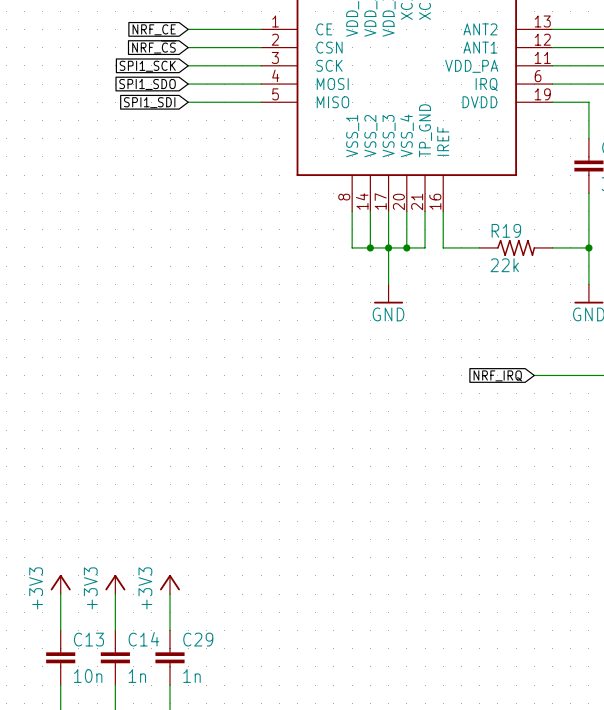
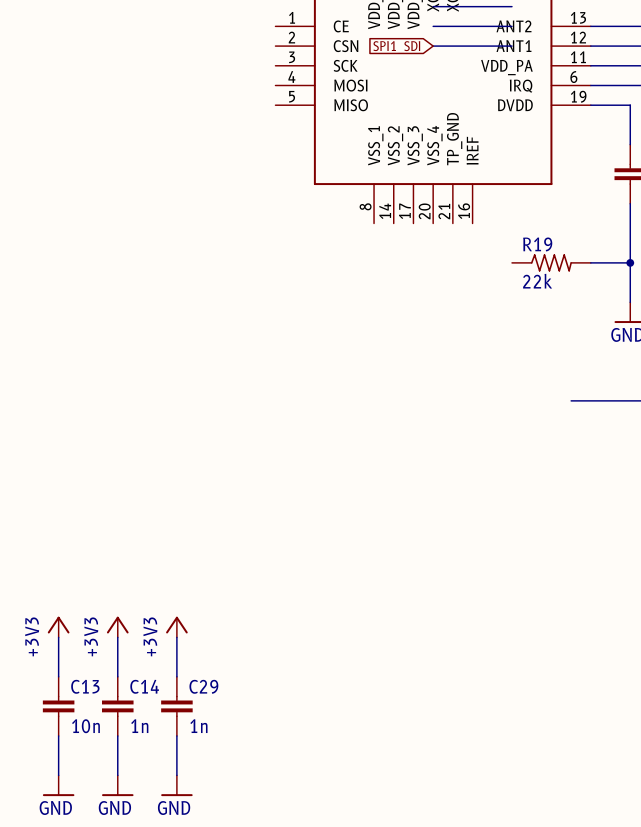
wire: none -> (433, 6) (512, 6)
global label: NRF_CE (154, 29) -> none
wire: (188, 29) (261, 29) -> none
wire: none -> (433, 26) (512, 26)
global label: NRF_~{CS} (154, 46) -> none
wire: (188, 47) (261, 47) -> none
wire: none -> (433, 46) (512, 46)
global label: none -> SPI1_SDI (396, 47)
wire: (188, 65) (261, 65) -> none
global label: SPI1_SCK (147, 66) -> none
global label: SPI1_SDO (147, 84) -> none
wire: (188, 84) (261, 84) -> none
global label: SPI1_SDI (149, 102) -> none
wire: (188, 102) (261, 102) -> none
wire: (352, 211) (352, 247) (425, 247) (425, 211) -> none
wire: (370, 211) (370, 247) -> none
wire: (388, 211) (388, 284) -> none
wire: (406, 211) (406, 247) -> none
wire: (443, 211) (443, 247) (479, 247) -> none
junction: (370, 247) -> none
junction: (388, 247) -> none
junction: (406, 247) -> none
power symbol: GND (388, 293) -> none
global label: NRF_IRQ (497, 375) -> none

